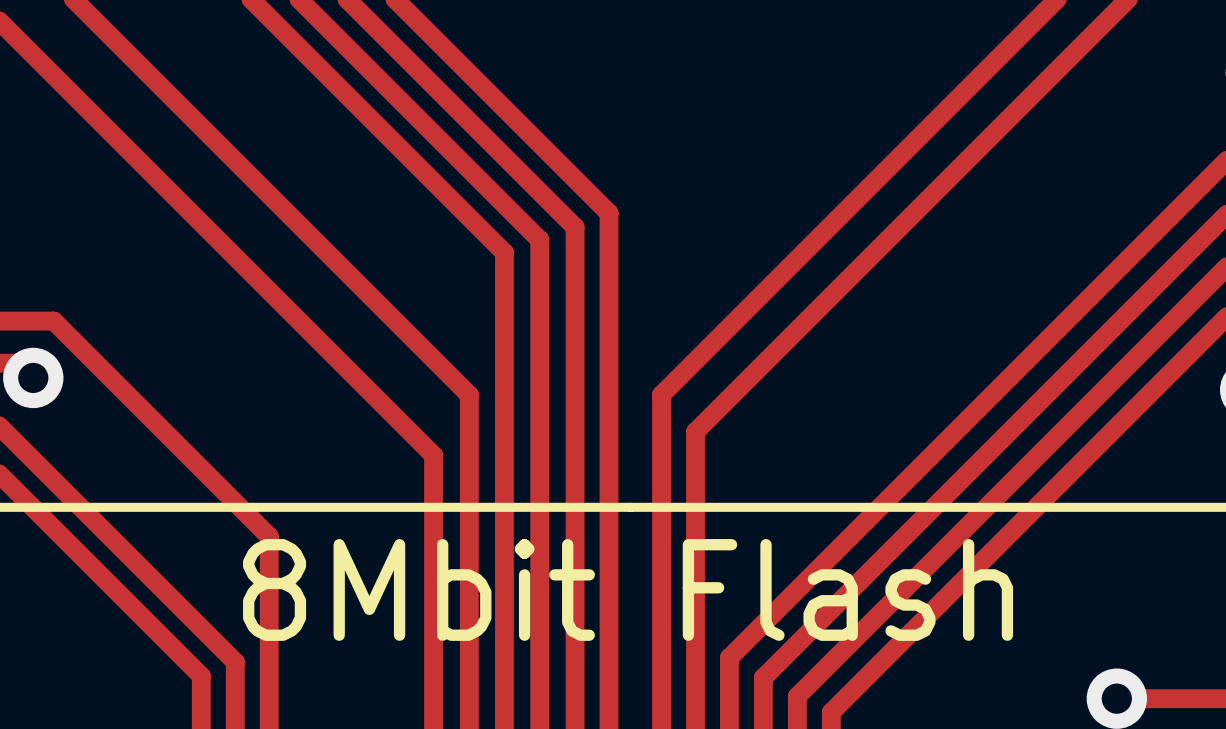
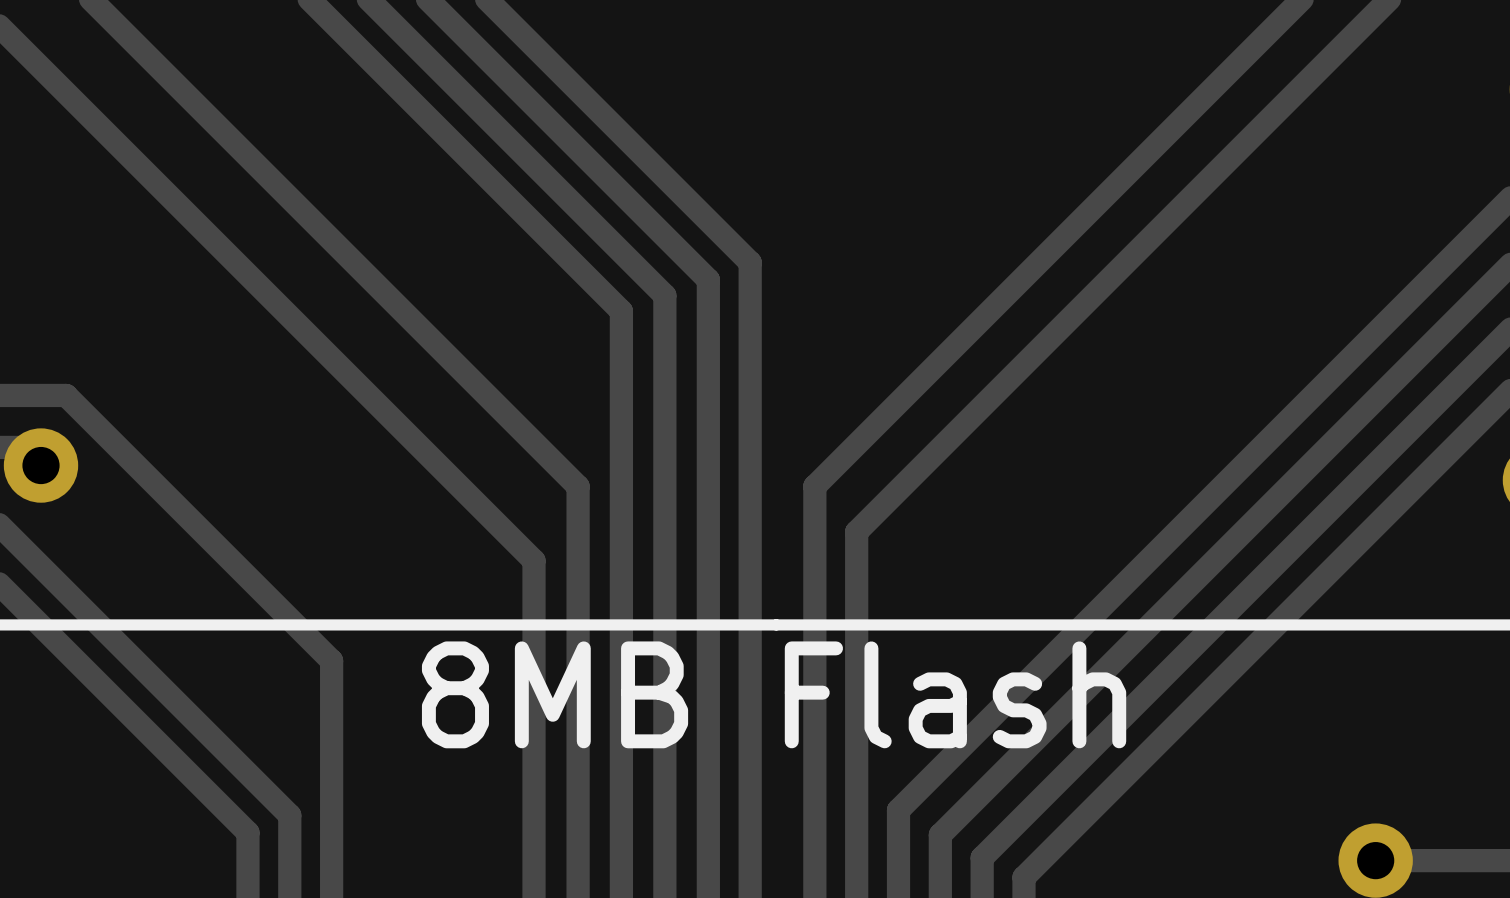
part value: 8Mbit Flash (628, 589) -> 8MB Flash (774, 694)

